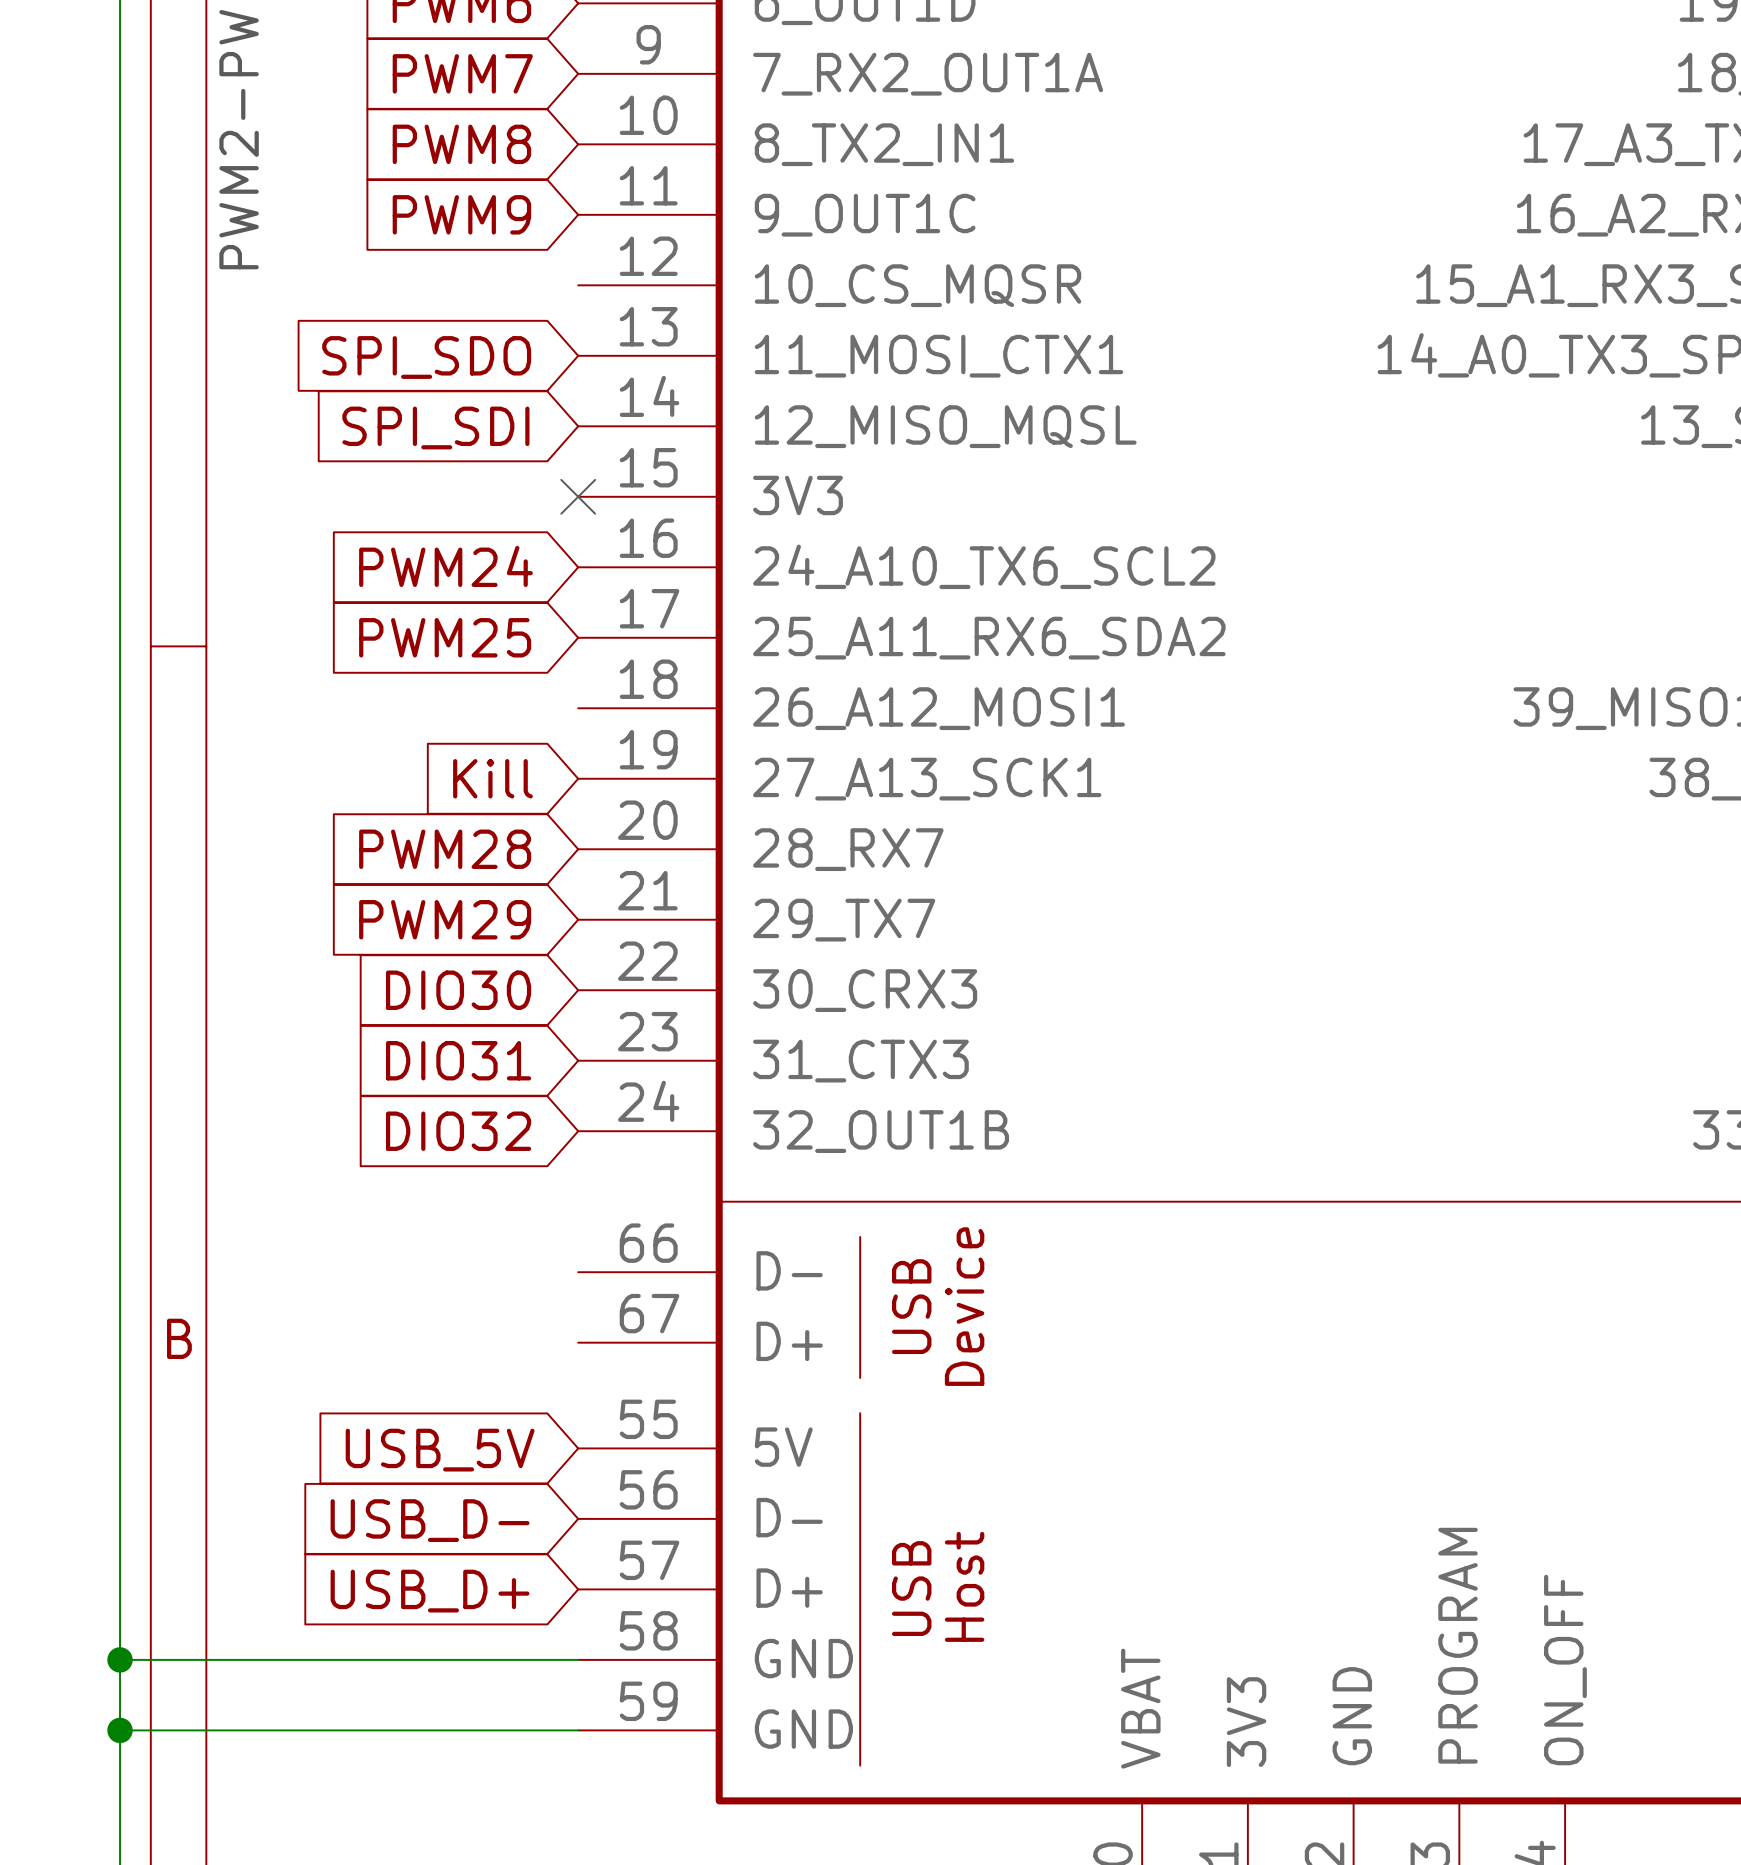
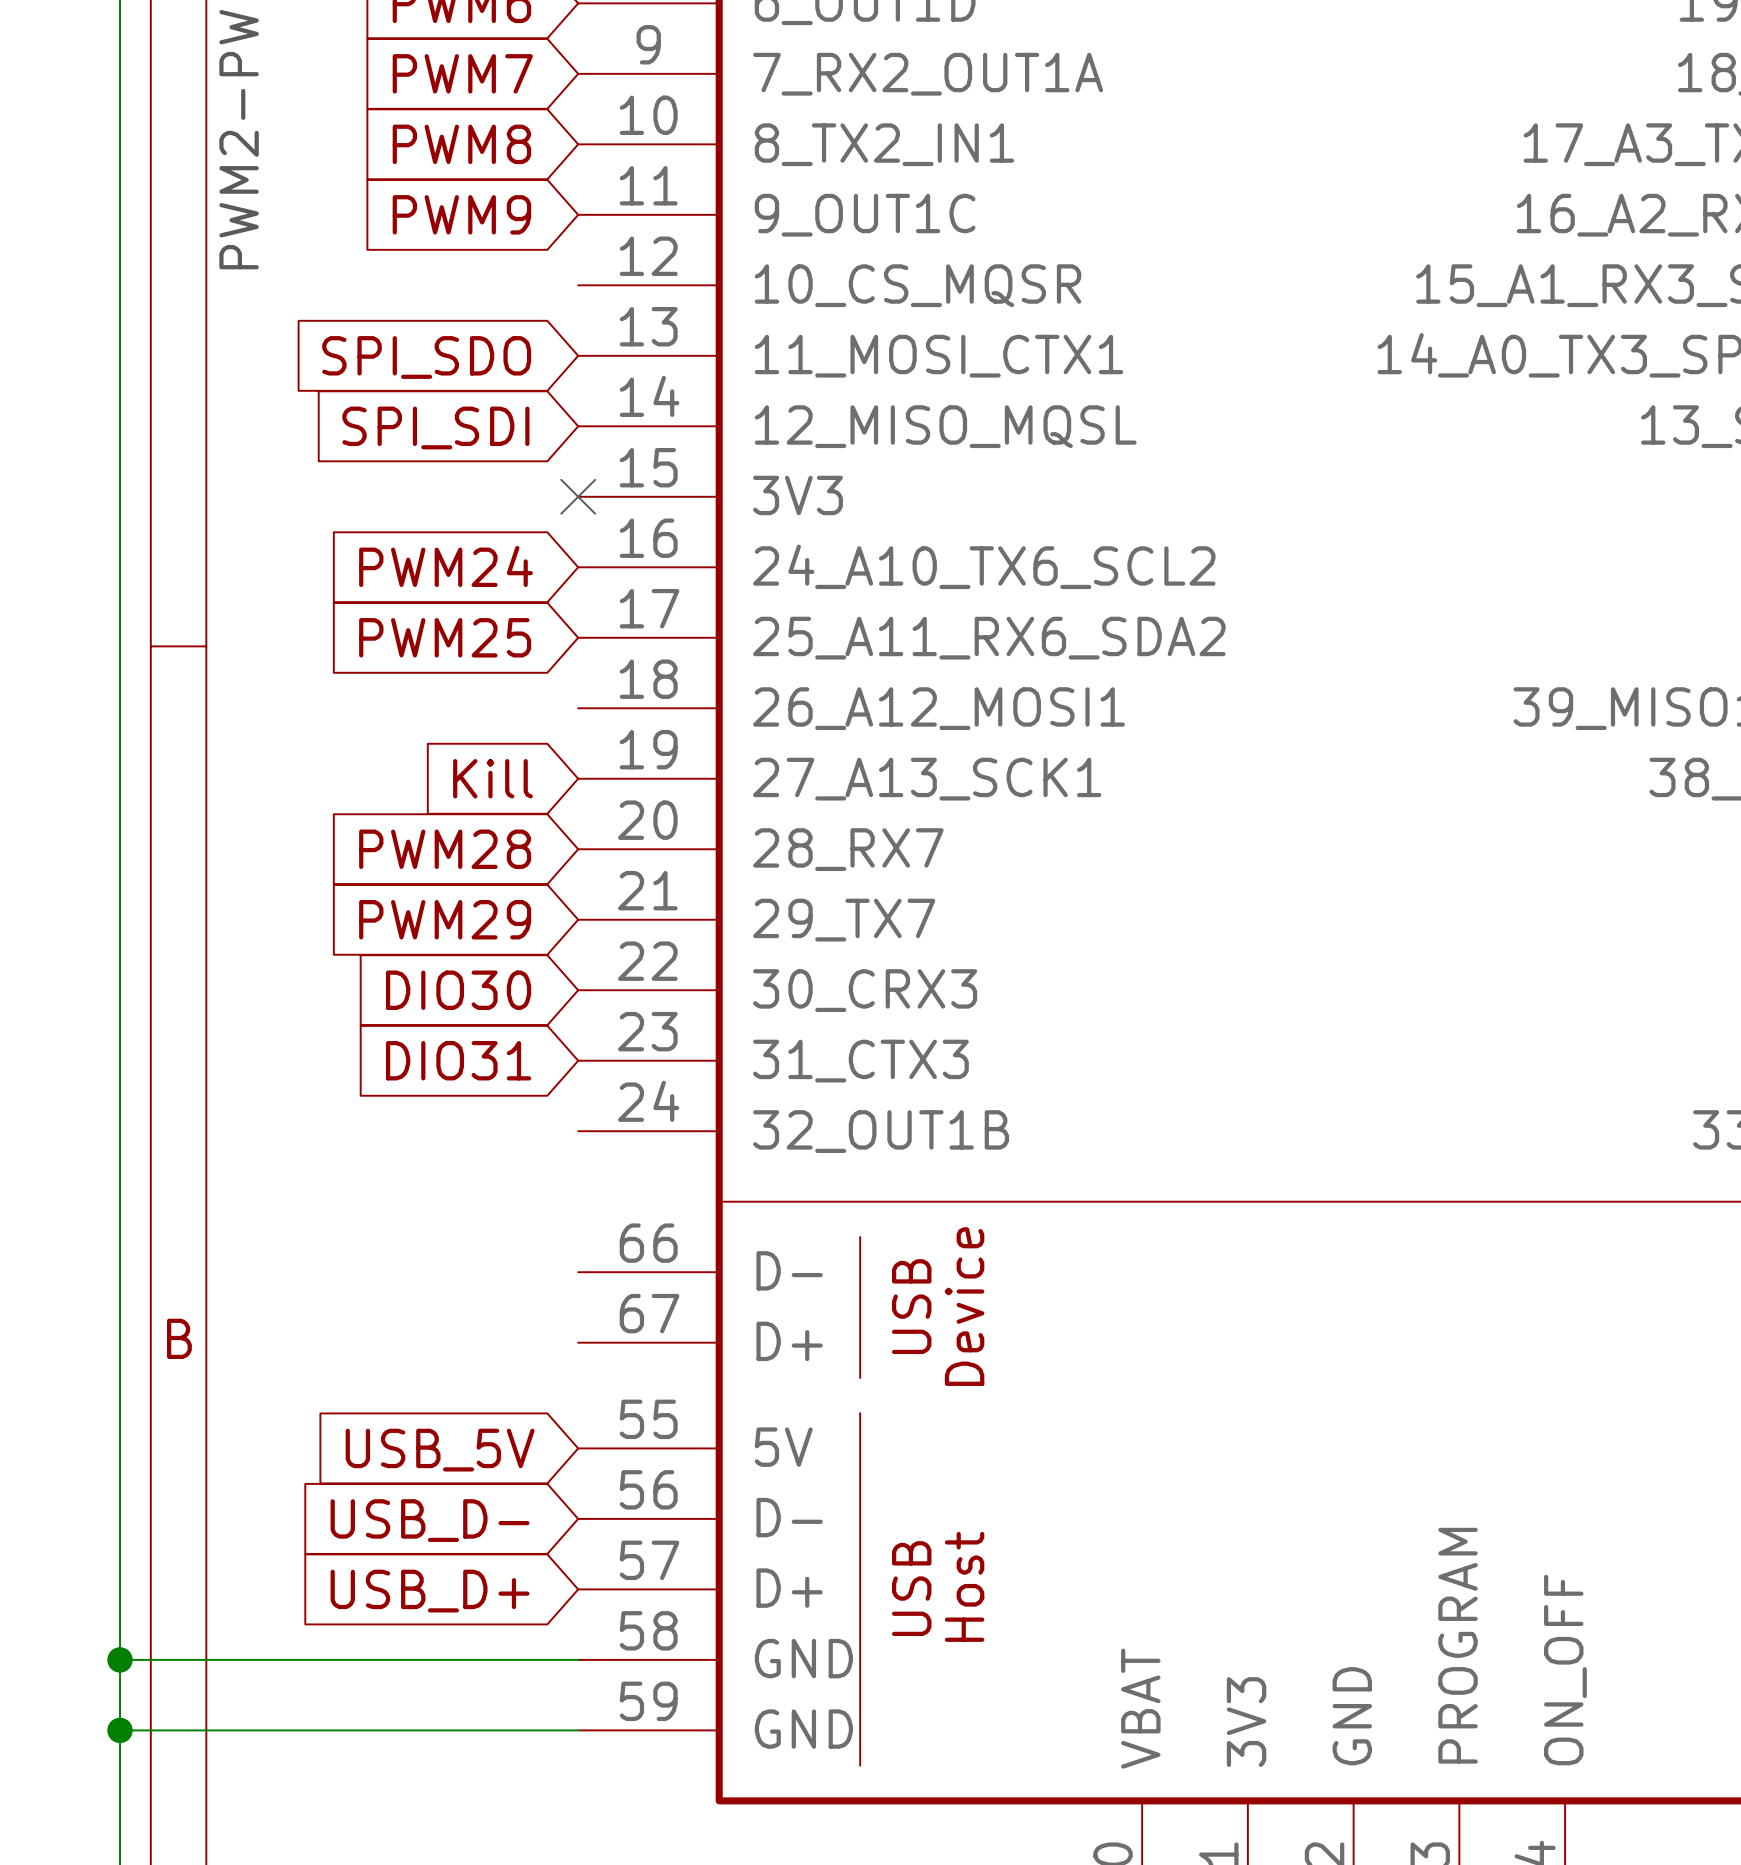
global label: DIO32 (458, 1131) -> none

